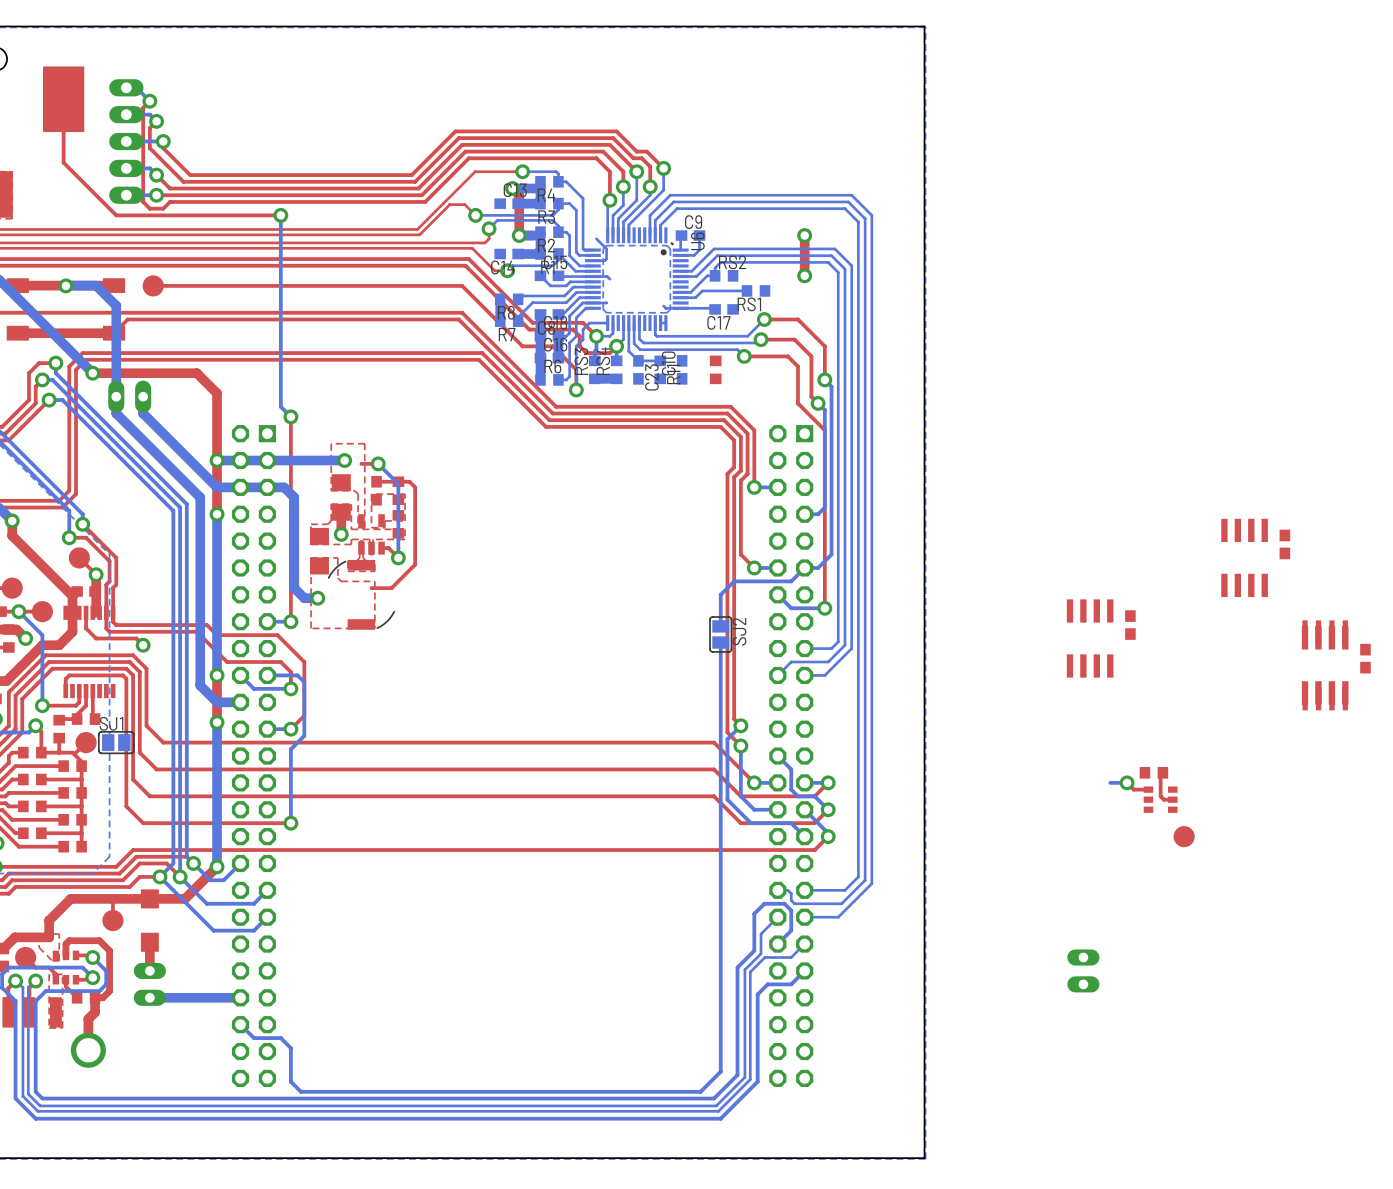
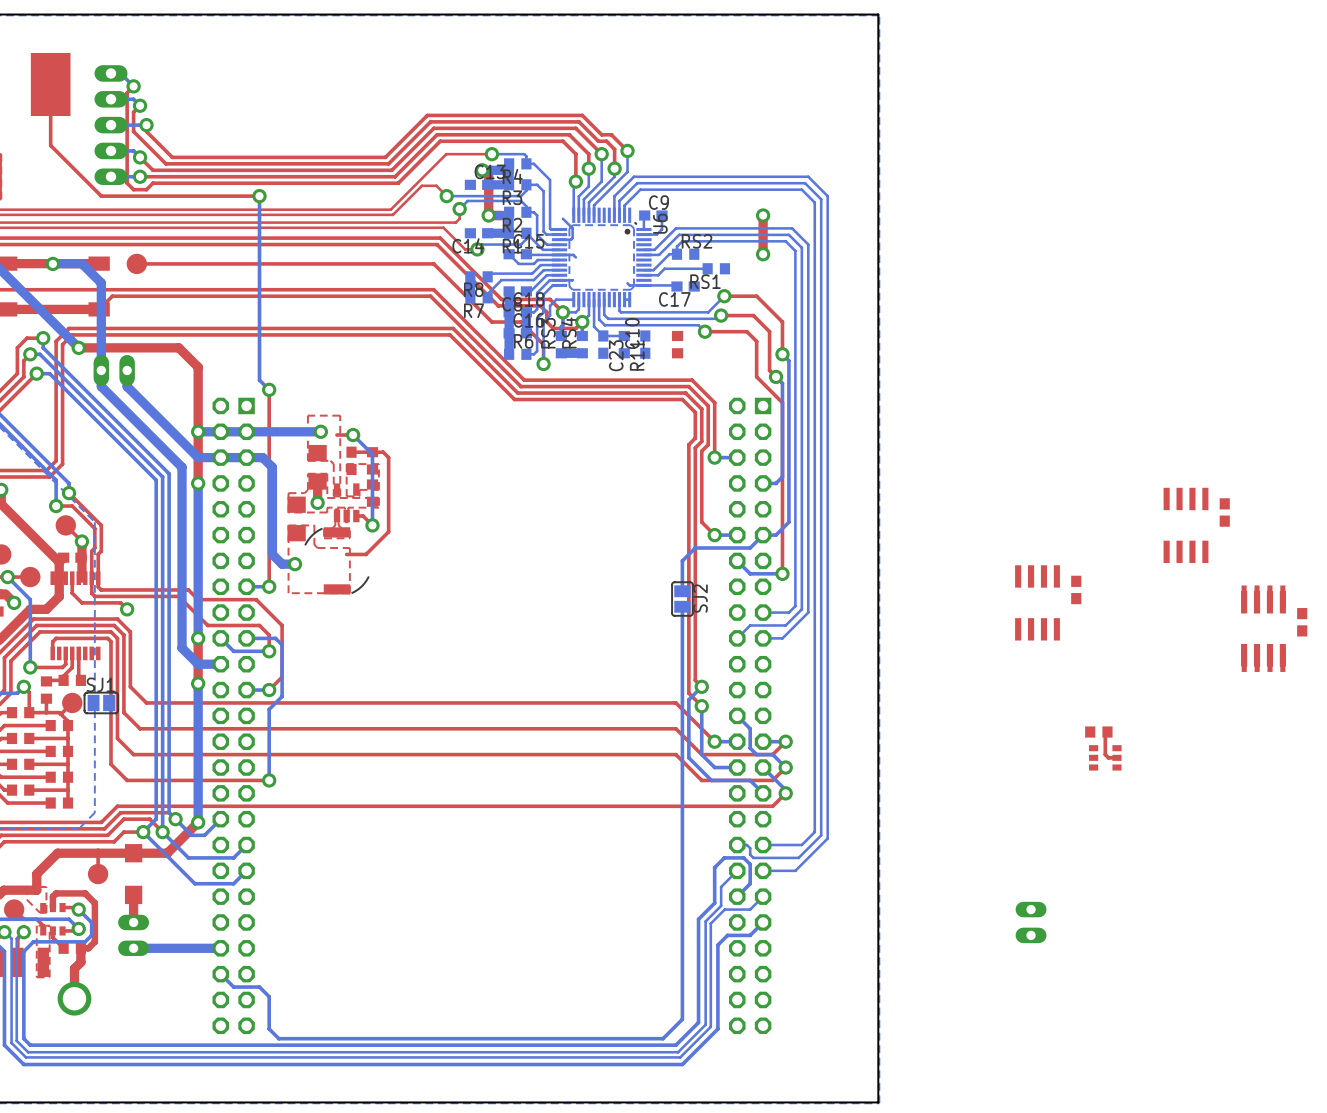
top track: (1127, 782) (1133, 789) (1148, 789) -> none
bottom track: (1127, 782) (1110, 782) -> none
via: (1127, 782) -> none
part: (1184, 836) -> none

